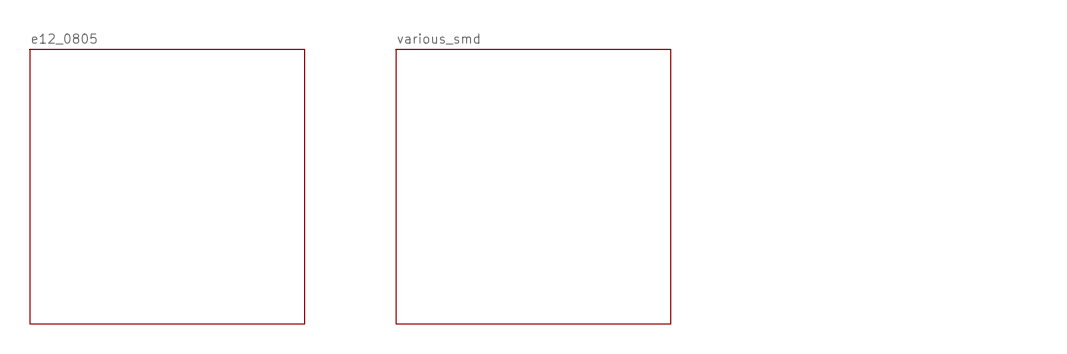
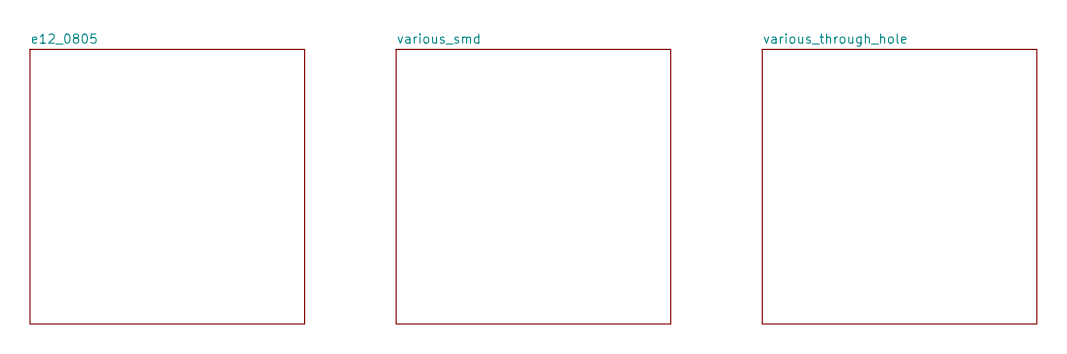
sheet various_through_hole: none -> (899, 186)

